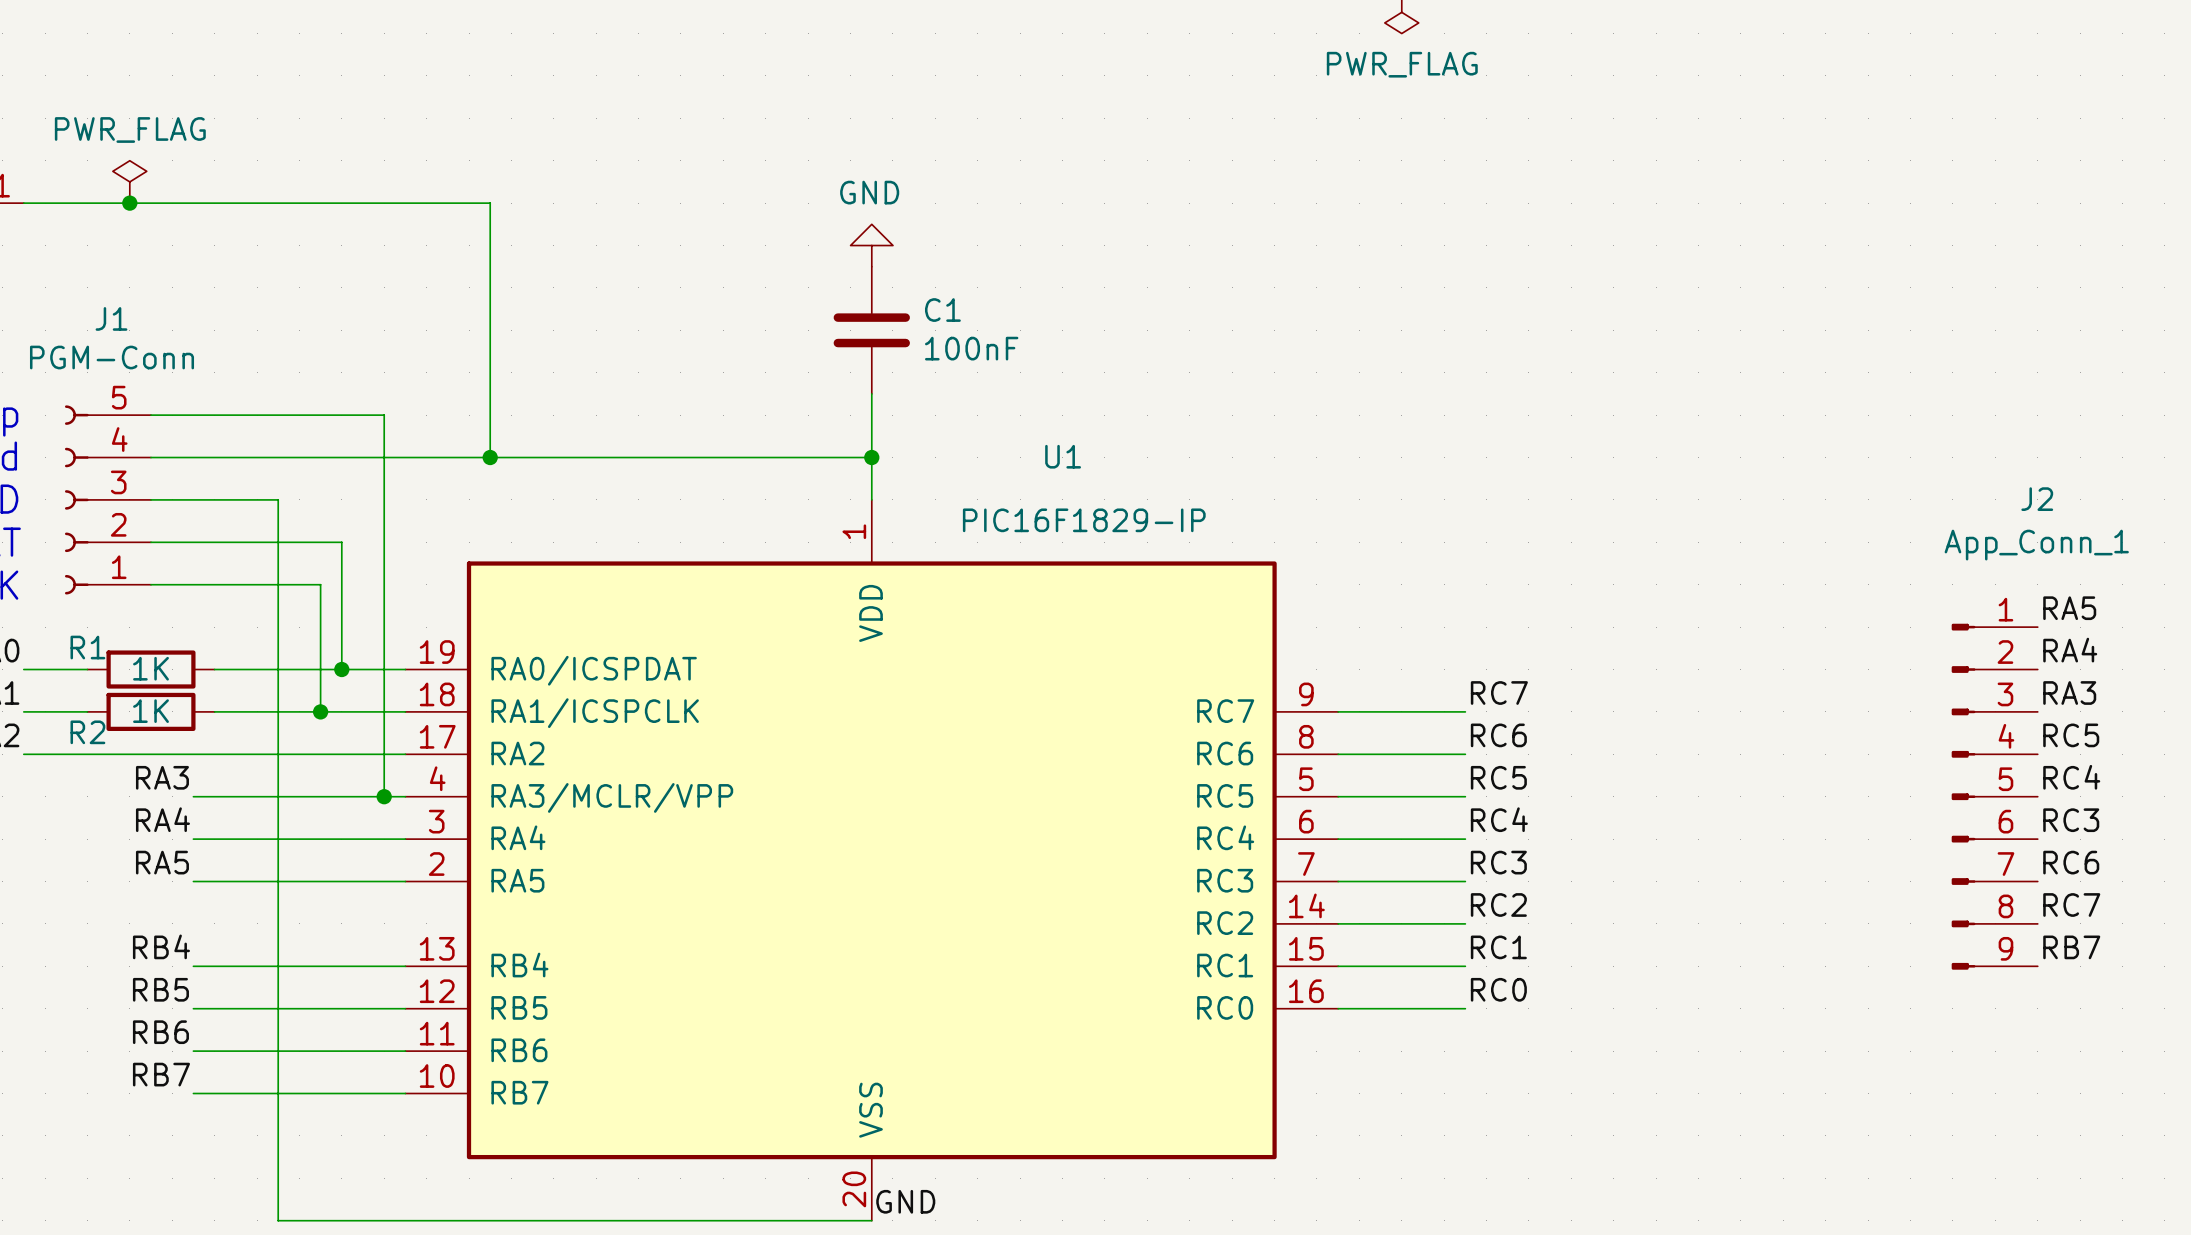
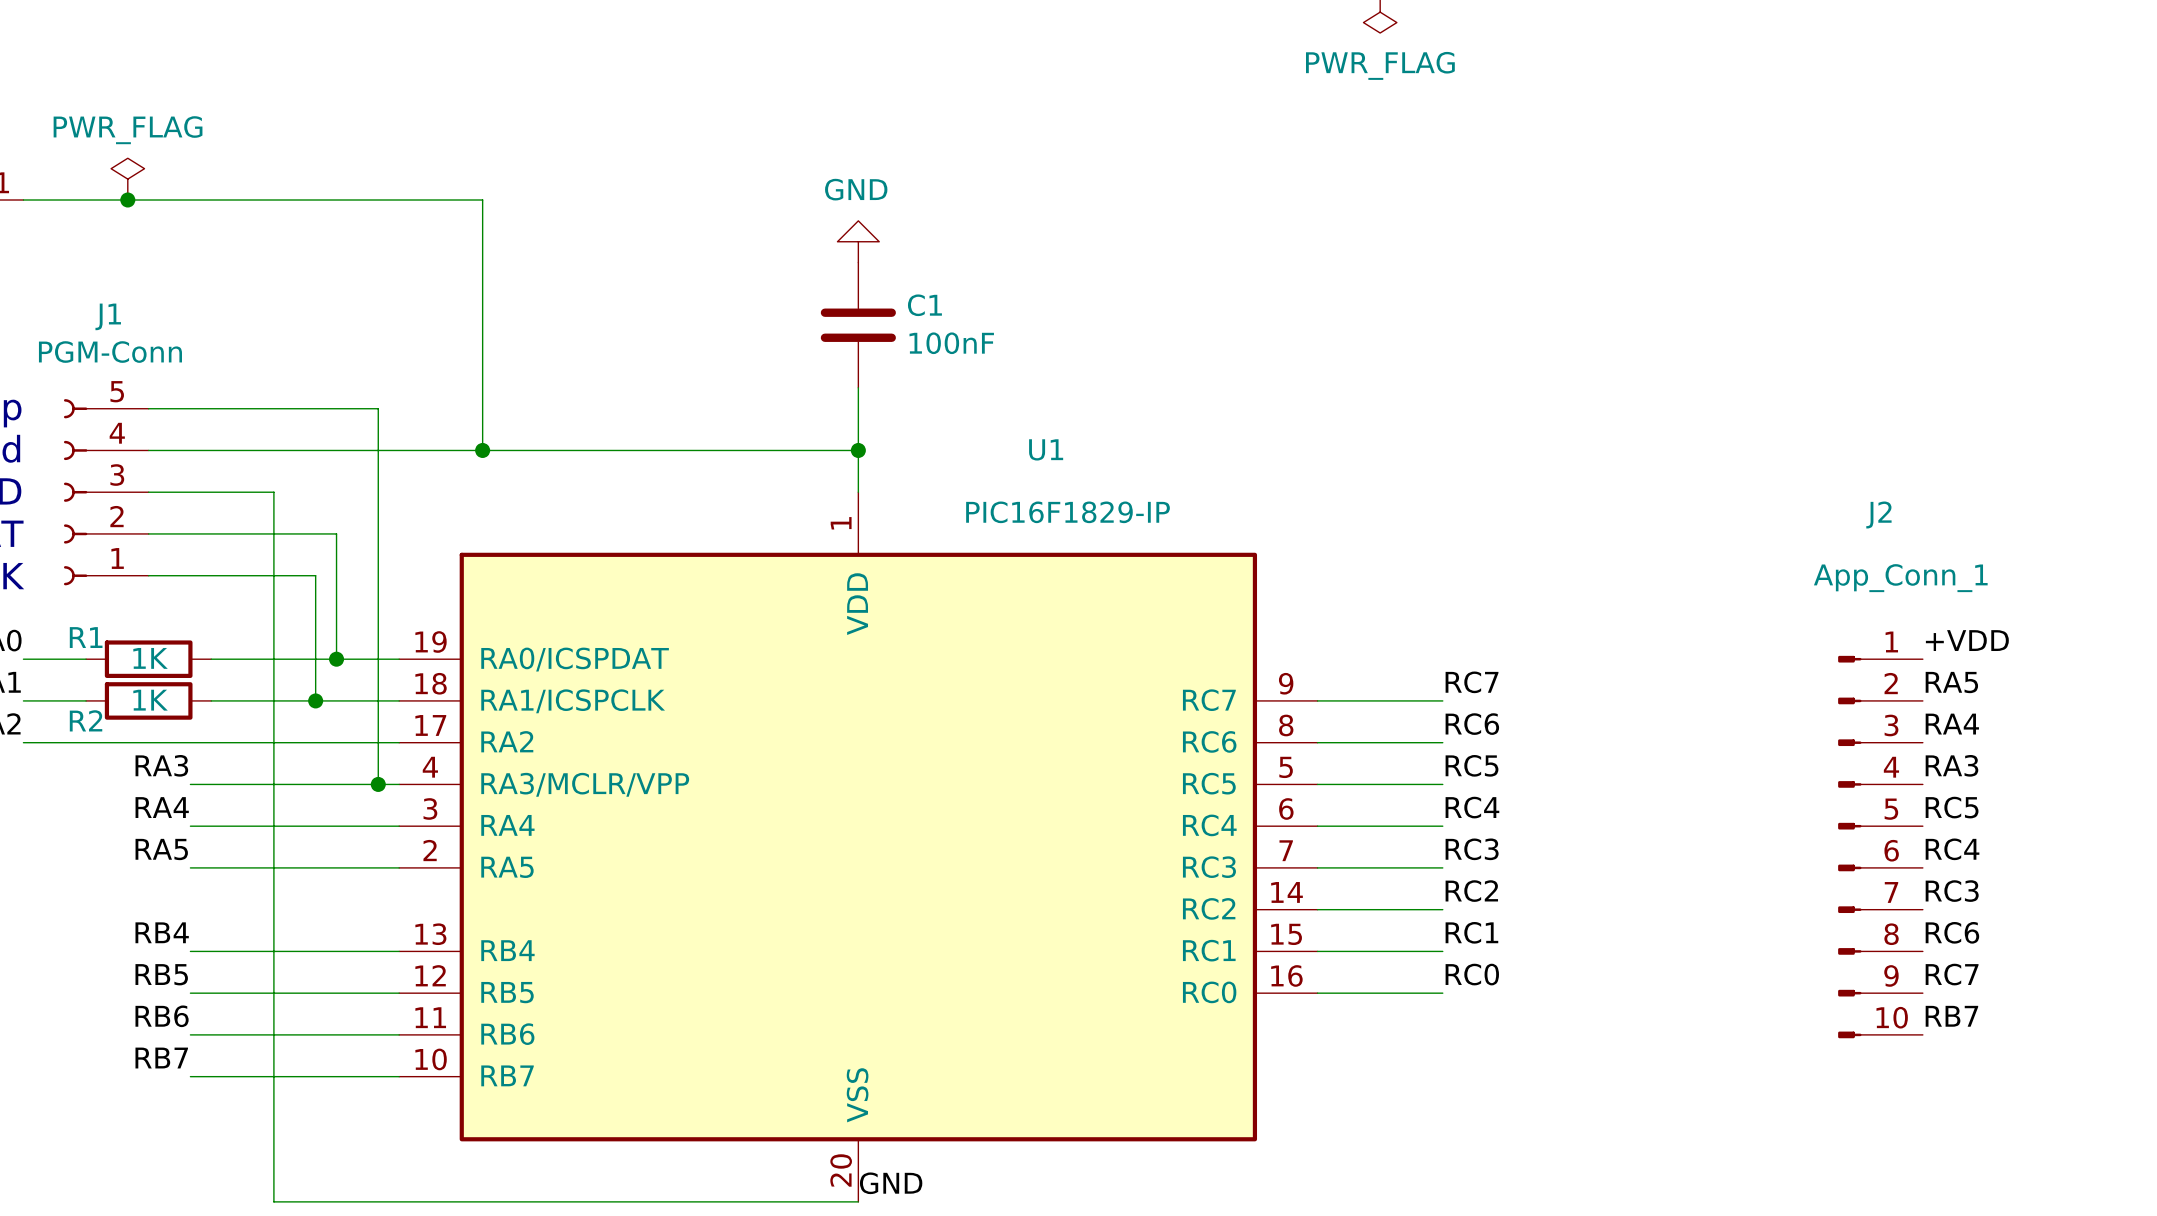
J2 name position: J2 (2037, 499) -> J2 (1878, 514)
label position: RA5 (2069, 608) -> RA5 (1951, 682)
J2 symbol: [1951, 623, 2038, 970] -> [1838, 655, 1923, 1039]
label: none -> +VDD (1967, 640)
label position: RA4 (2070, 650) -> RA4 (1952, 724)
label position: RA3 (2069, 693) -> RA3 (1951, 765)
label position: RC5 (2071, 735) -> RC5 (1952, 807)
label position: RC4 (2071, 777) -> RC4 (1952, 849)
label position: RC3 (2071, 820) -> RC3 (1952, 891)
label position: RC6 (2071, 862) -> RC6 (1952, 932)
label position: RC7 (2071, 904) -> RC7 (1952, 974)
label position: RB7 (2071, 947) -> RB7 (1951, 1016)

